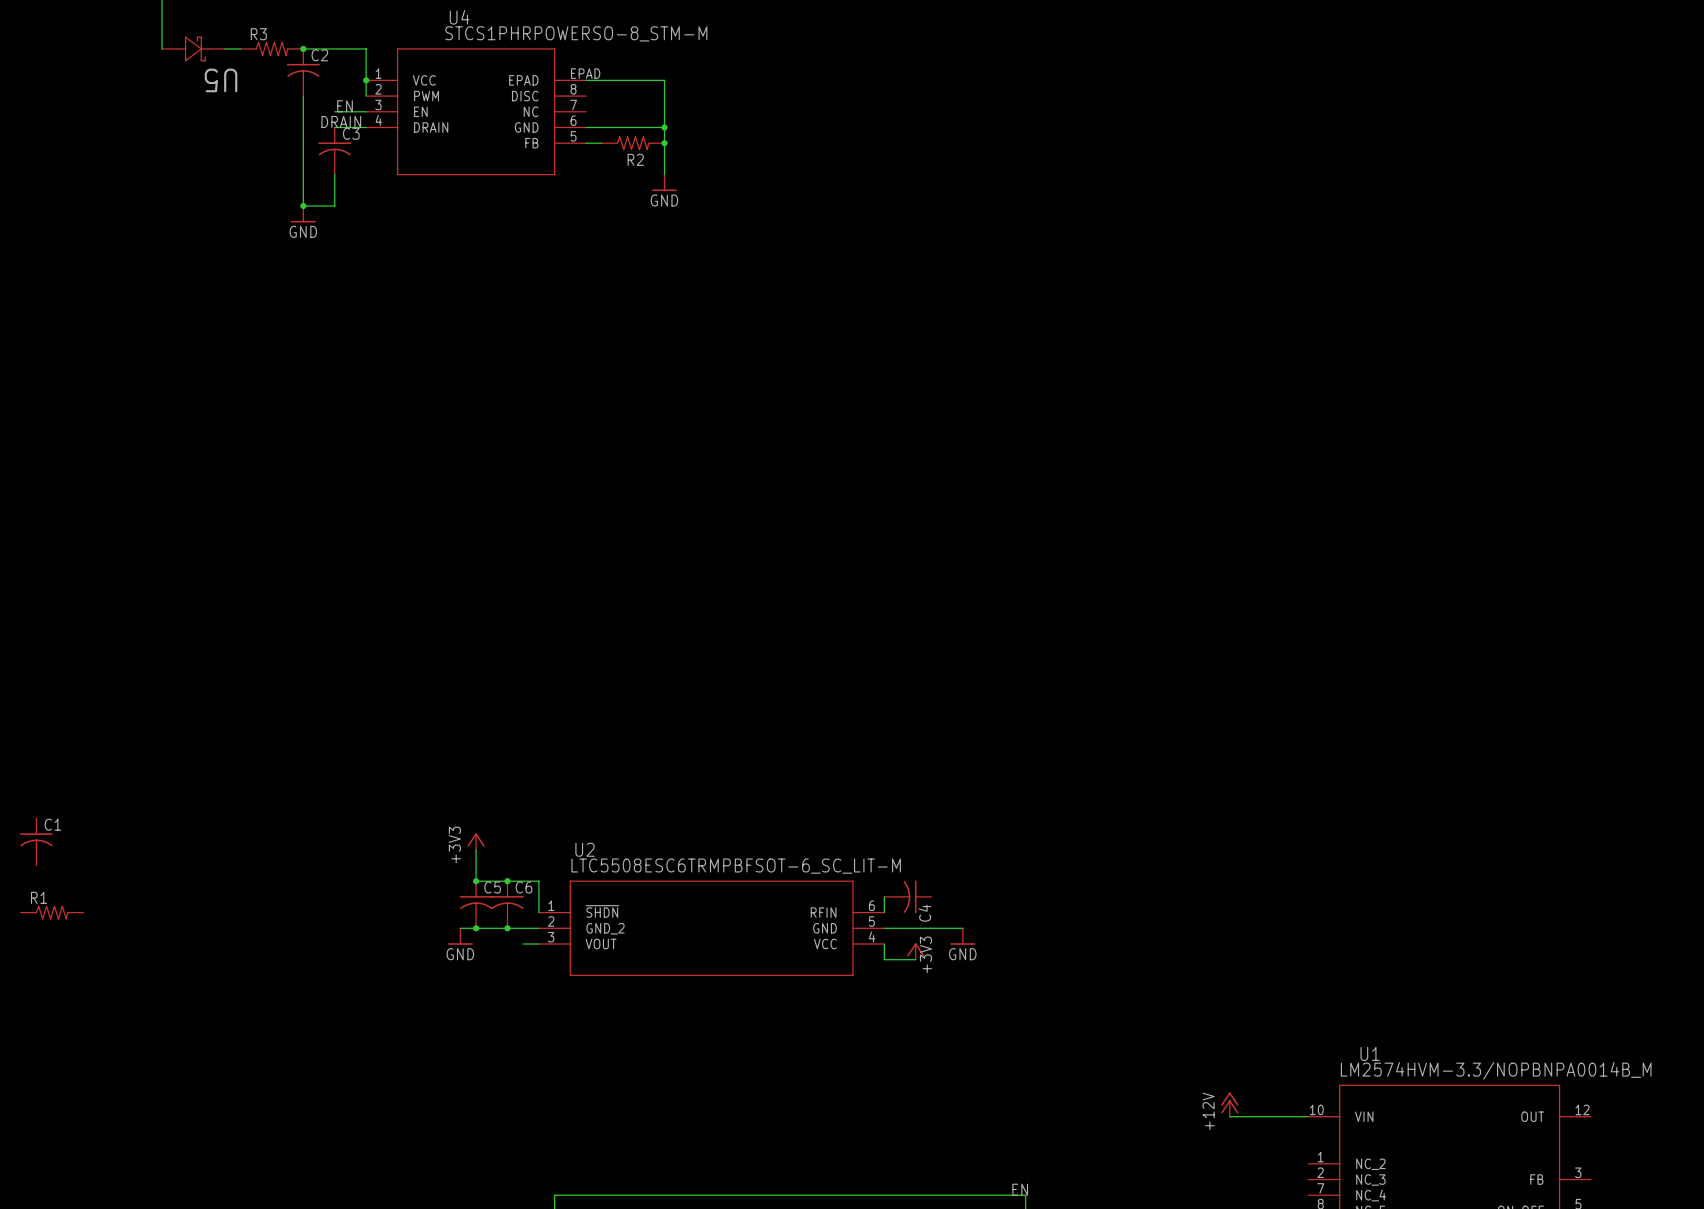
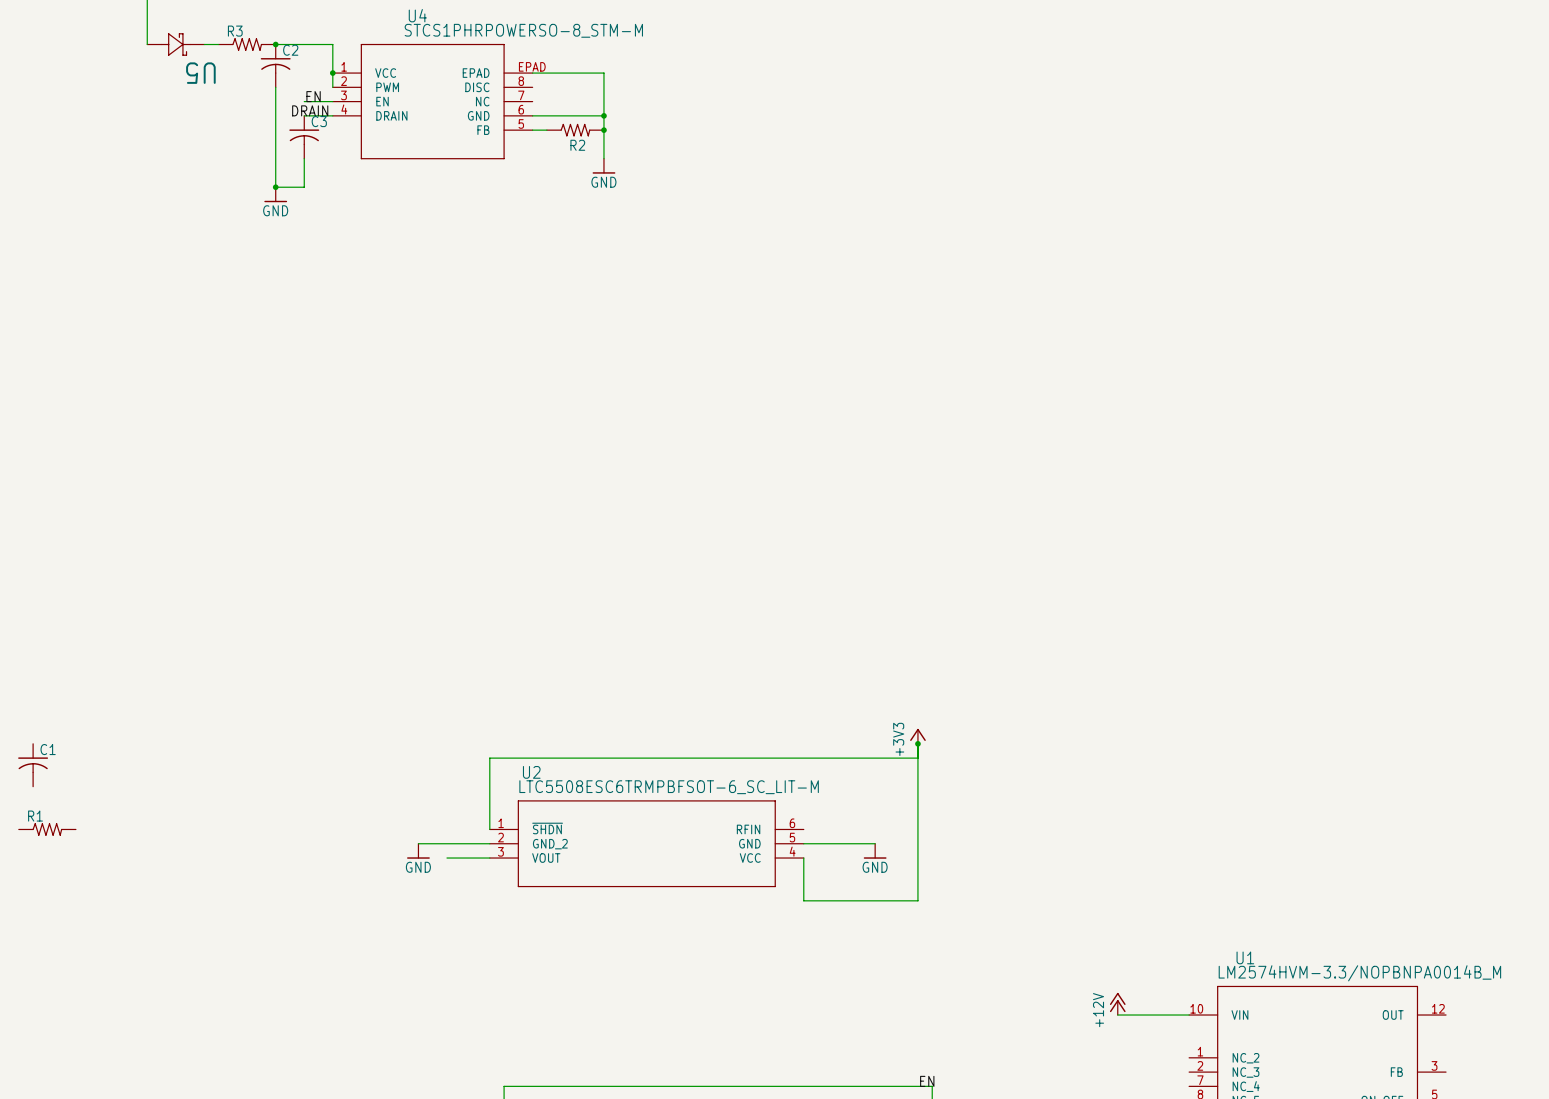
power symbol: none -> +3V3 (917, 736)
junction: none -> (917, 743)
power symbol: +3V3 (476, 841) -> none
wire: (476, 849) (476, 881) (538, 881) -> (917, 758) (489, 758) (489, 800)
junction: (476, 881) -> none
junction: (507, 881) -> none
wire: (884, 896) (884, 912) -> none
C4: (907, 896) -> none
C5: (476, 904) -> none
C6: (507, 904) -> none
junction: (476, 928) -> none
junction: (507, 928) -> none
wire: none -> (446, 858) (475, 858)
power symbol: +3V3 (915, 951) -> none
wire: (884, 959) (915, 959) -> (803, 872) (803, 900) (917, 900) (917, 743)

